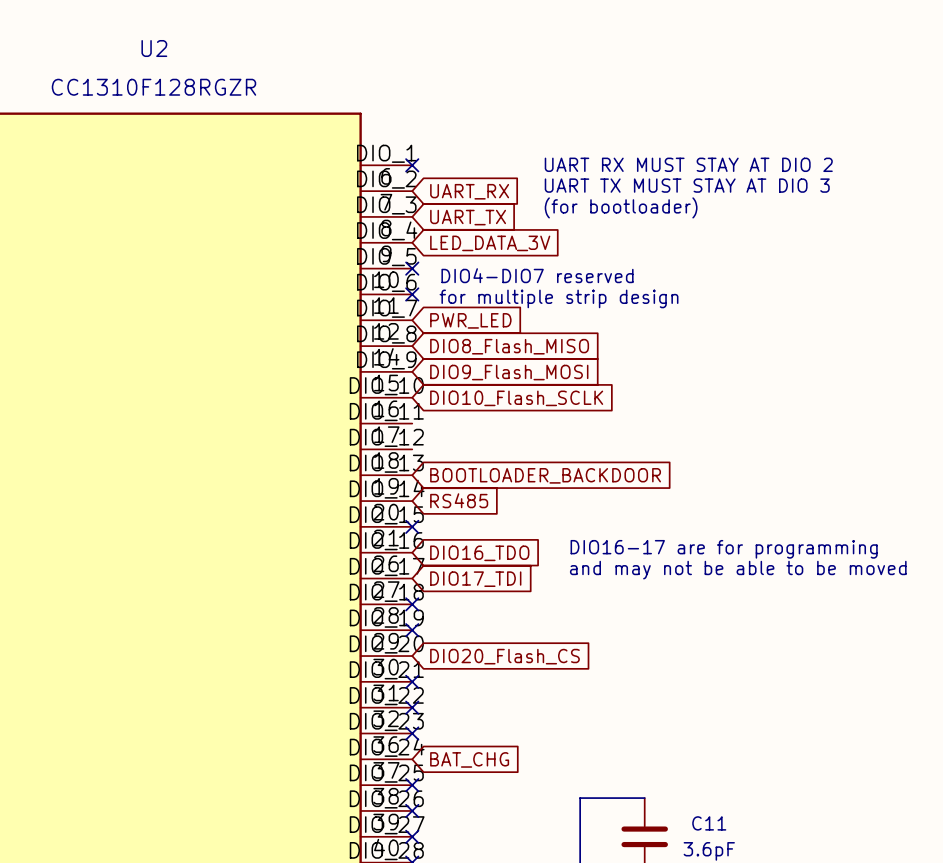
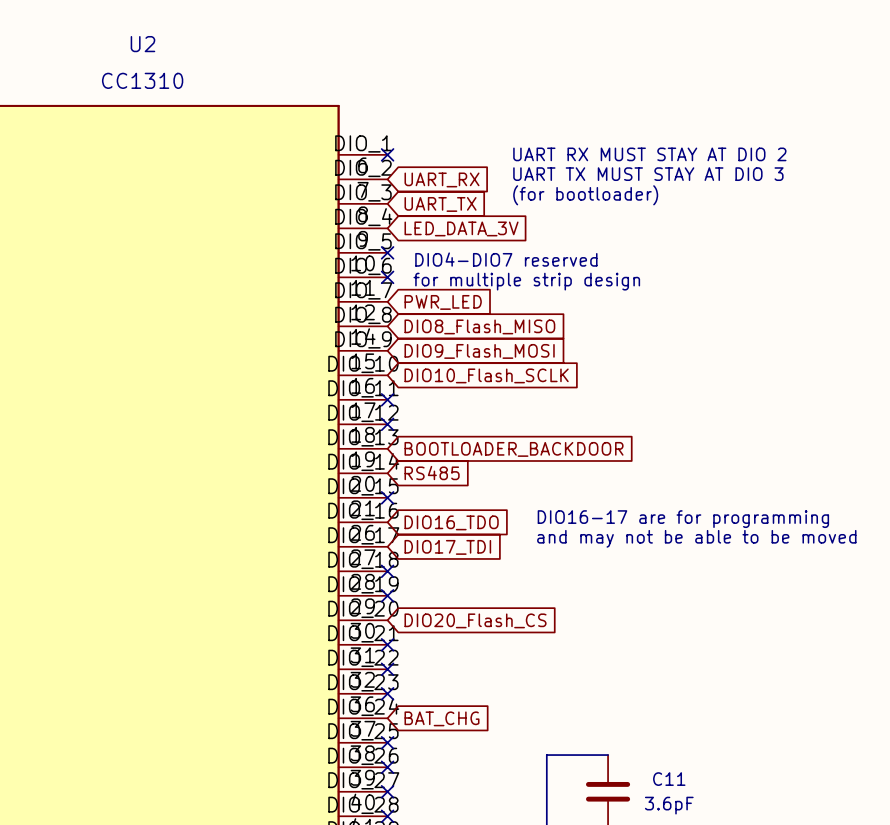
U2 value: CC1310F128RGZR (153, 87) -> CC1310 (142, 80)
no-connect mark: none -> (387, 399)
no-connect mark: none -> (387, 424)

